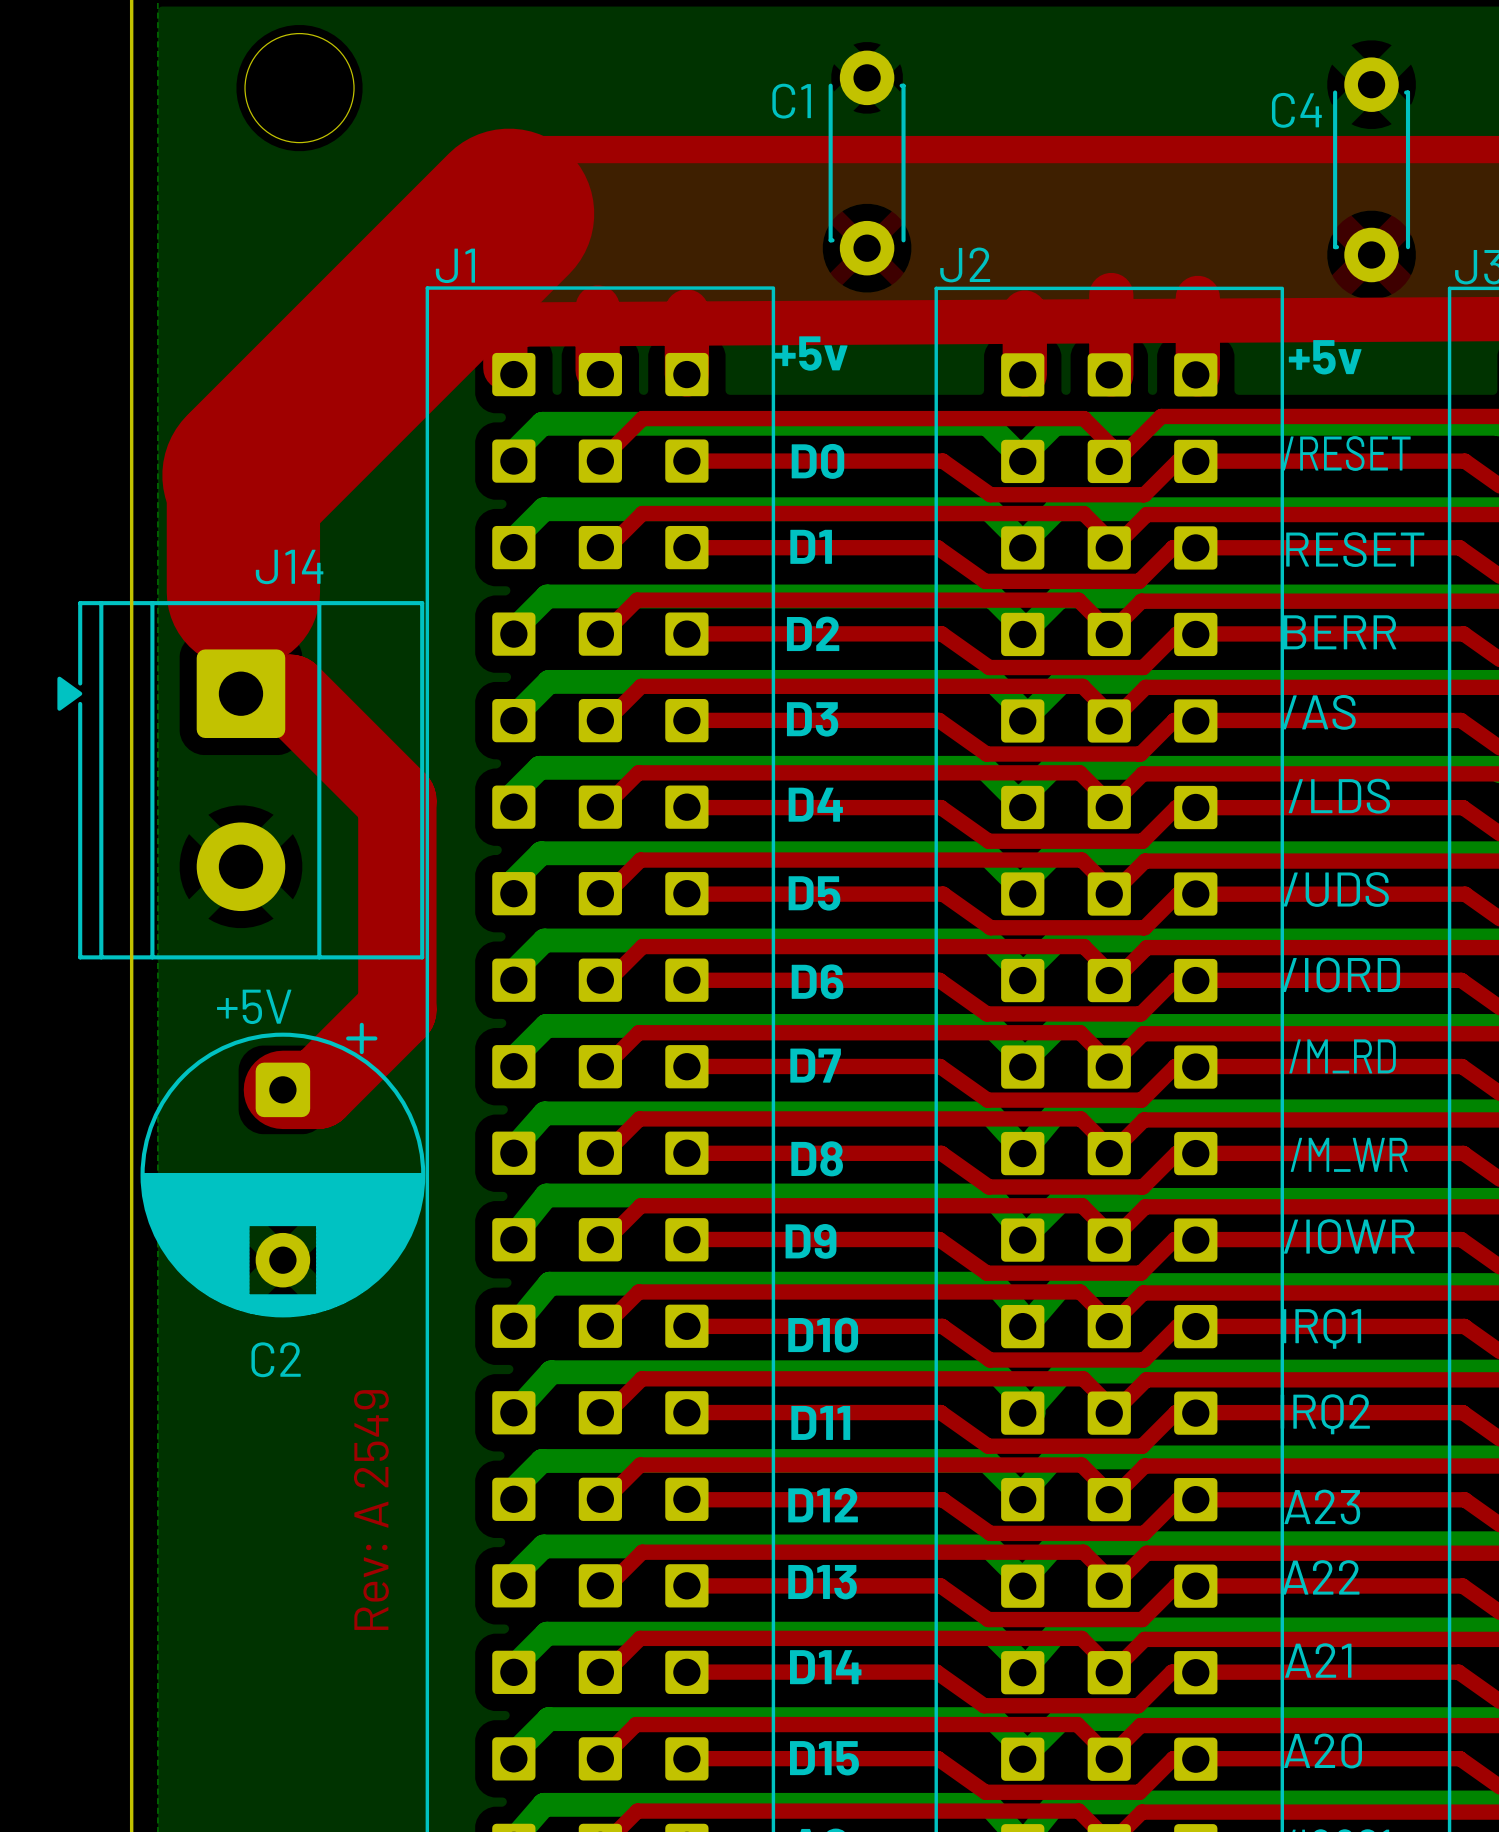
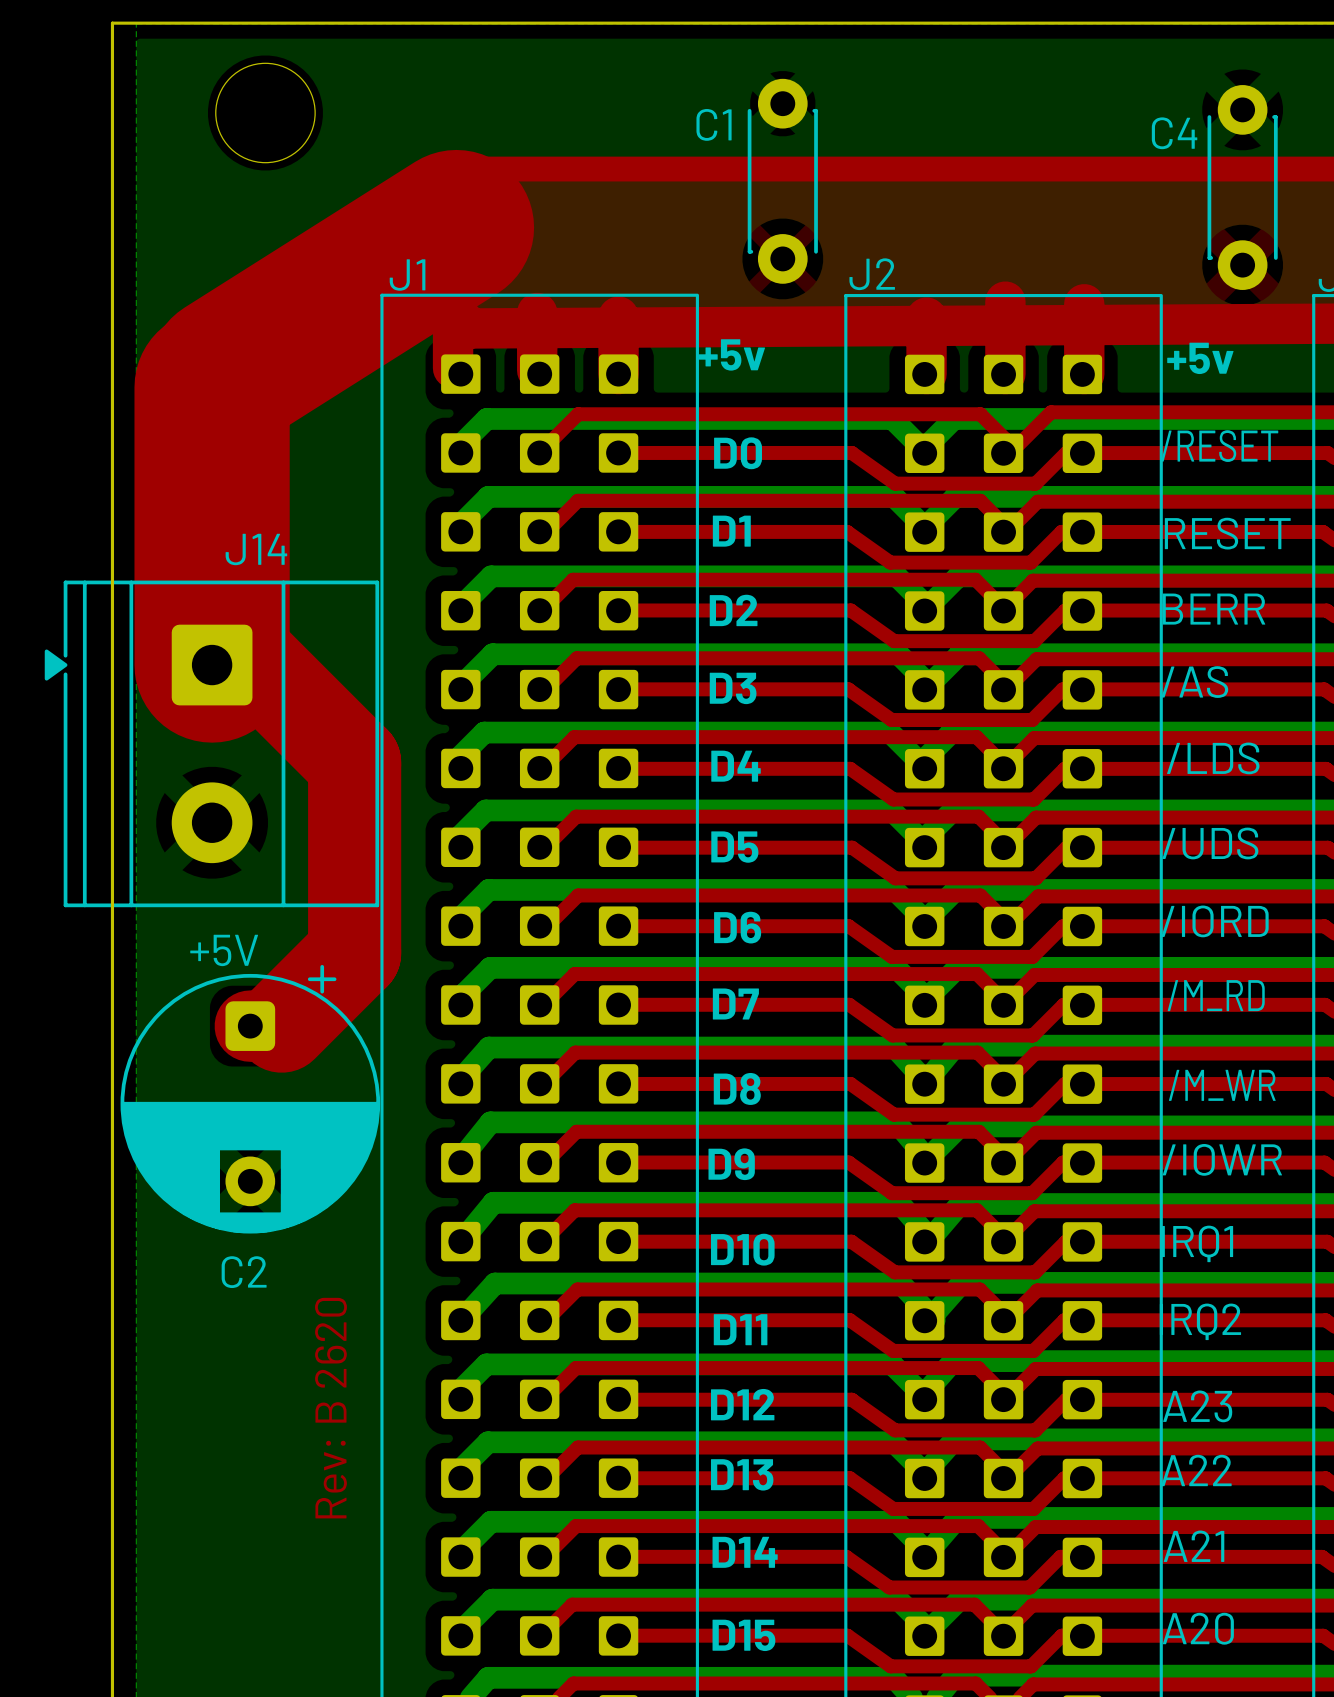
top track: (509, 213) (247, 475) -> (456, 227) (226, 373) (212, 387) (212, 665)
top track width: thin (290, 693) (397, 801) (397, 1009) (317, 1089) -> thick (256, 665) (354, 762) (354, 953) (281, 1026)
text: Rev: A 2549 (371, 1510) -> Rev: B 2620 (330, 1408)

